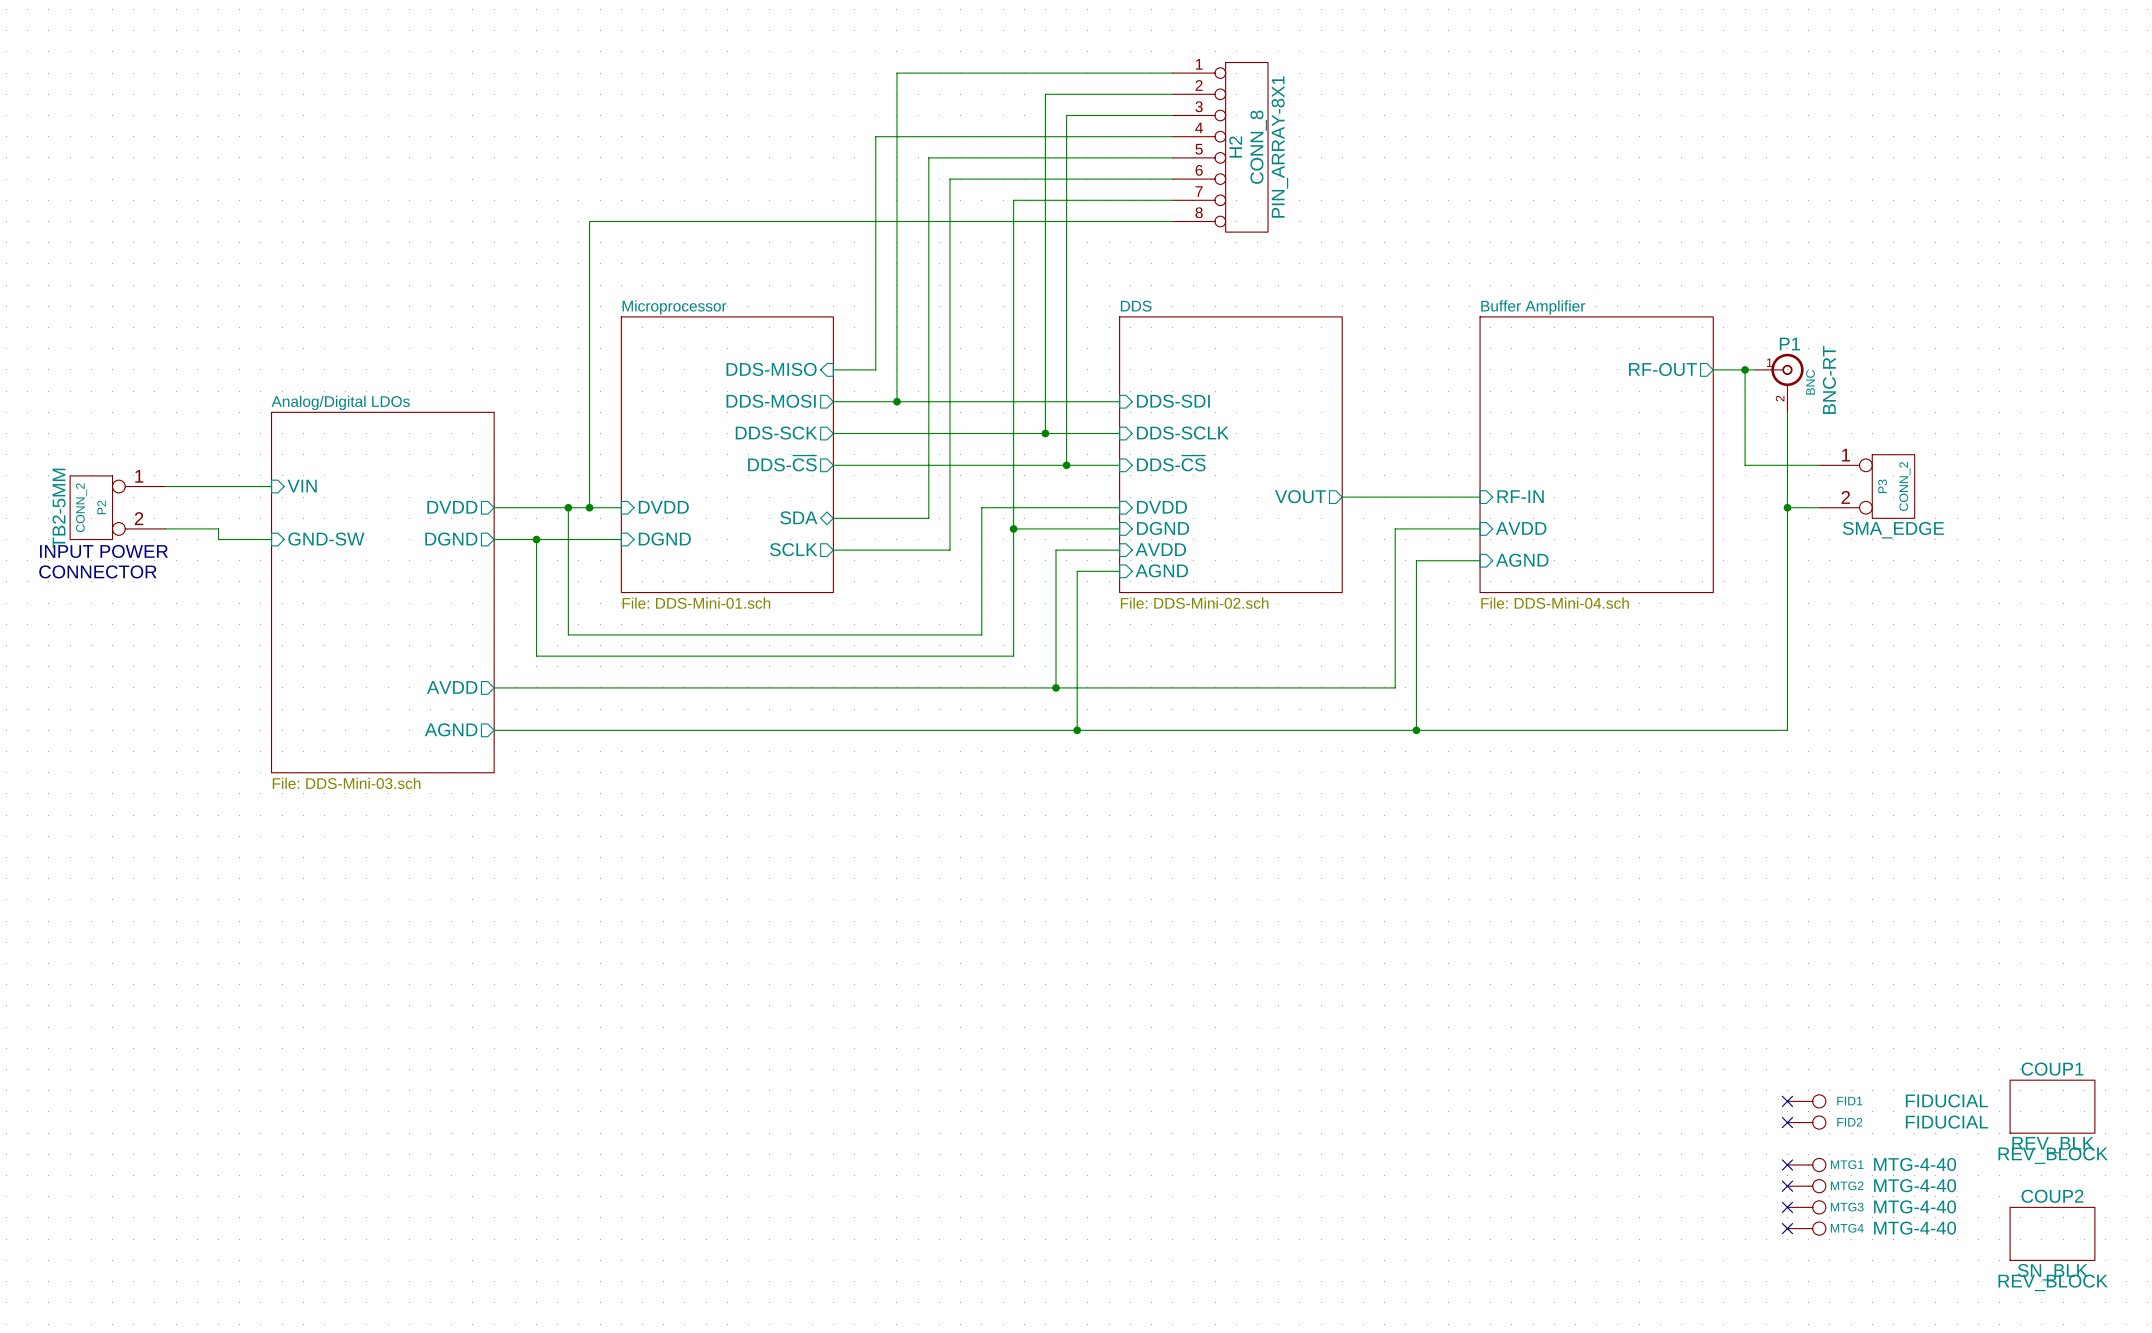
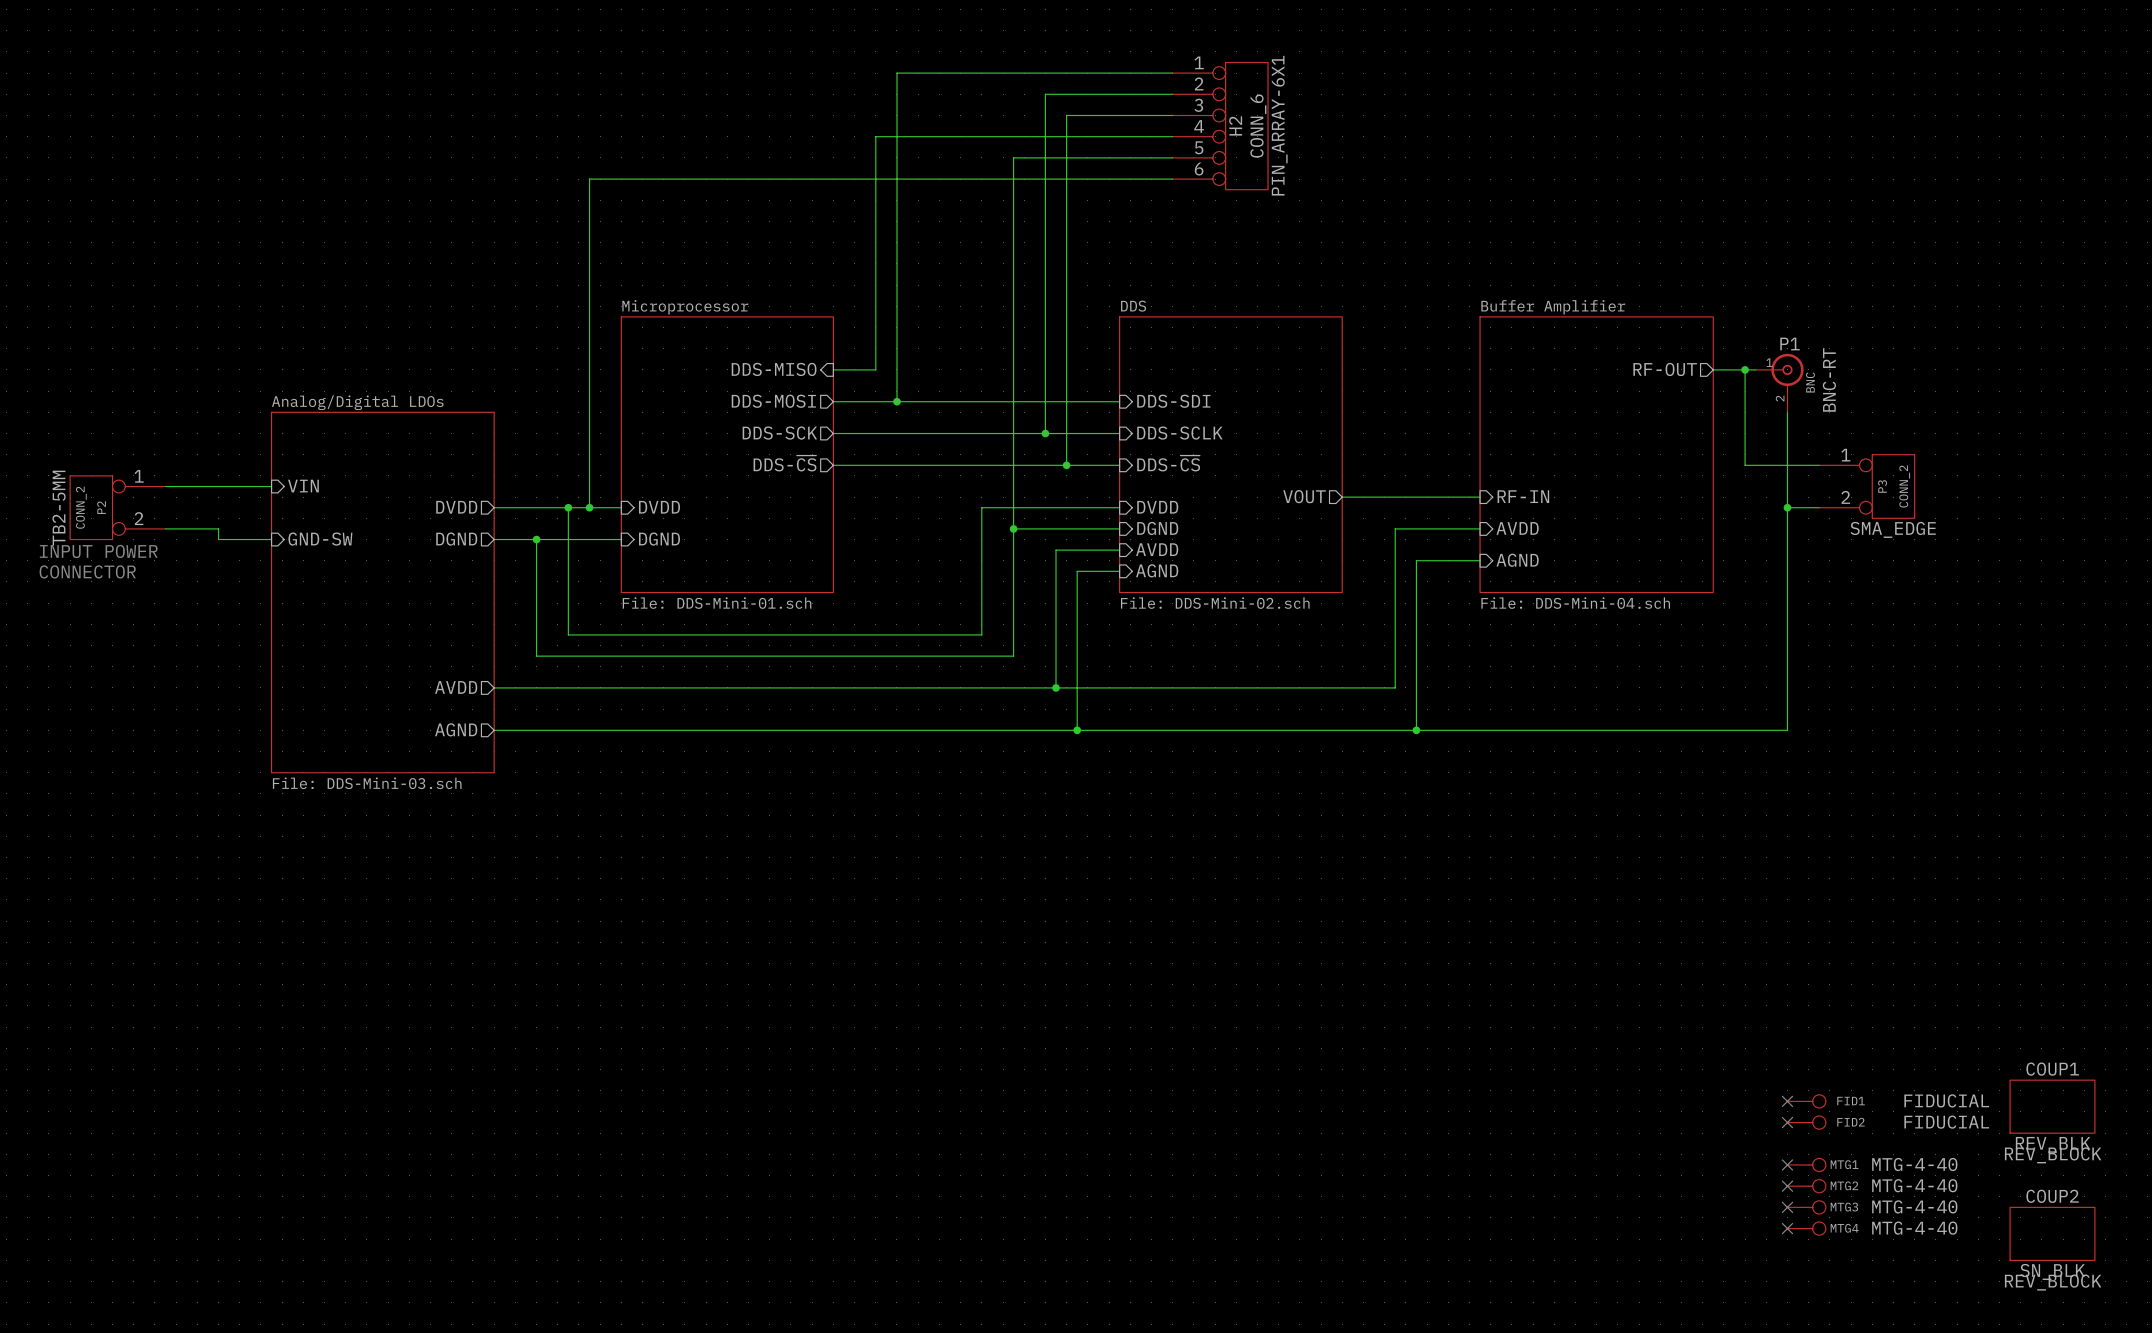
H2 symbol: [1172, 62, 1269, 233] -> [1172, 62, 1269, 190]
H2 text: PIN_ARRAY-8X1 (1279, 146) -> PIN_ARRAY-6X1 (1279, 125)
H2 value: CONN_8 (1258, 147) -> CONN_6 (1258, 126)
wire: (1013, 157) (928, 157) (928, 518) (833, 518) -> none
wire: (950, 179) (950, 550) (833, 550) -> none
wire: (1013, 200) (1172, 200) -> (1013, 200) (1013, 157)
wire: (589, 221) (1172, 221) -> (589, 221) (589, 179) (950, 179)
sheet pin: SDA (798, 517) -> none
sheet pin: SCLK (793, 549) -> none

